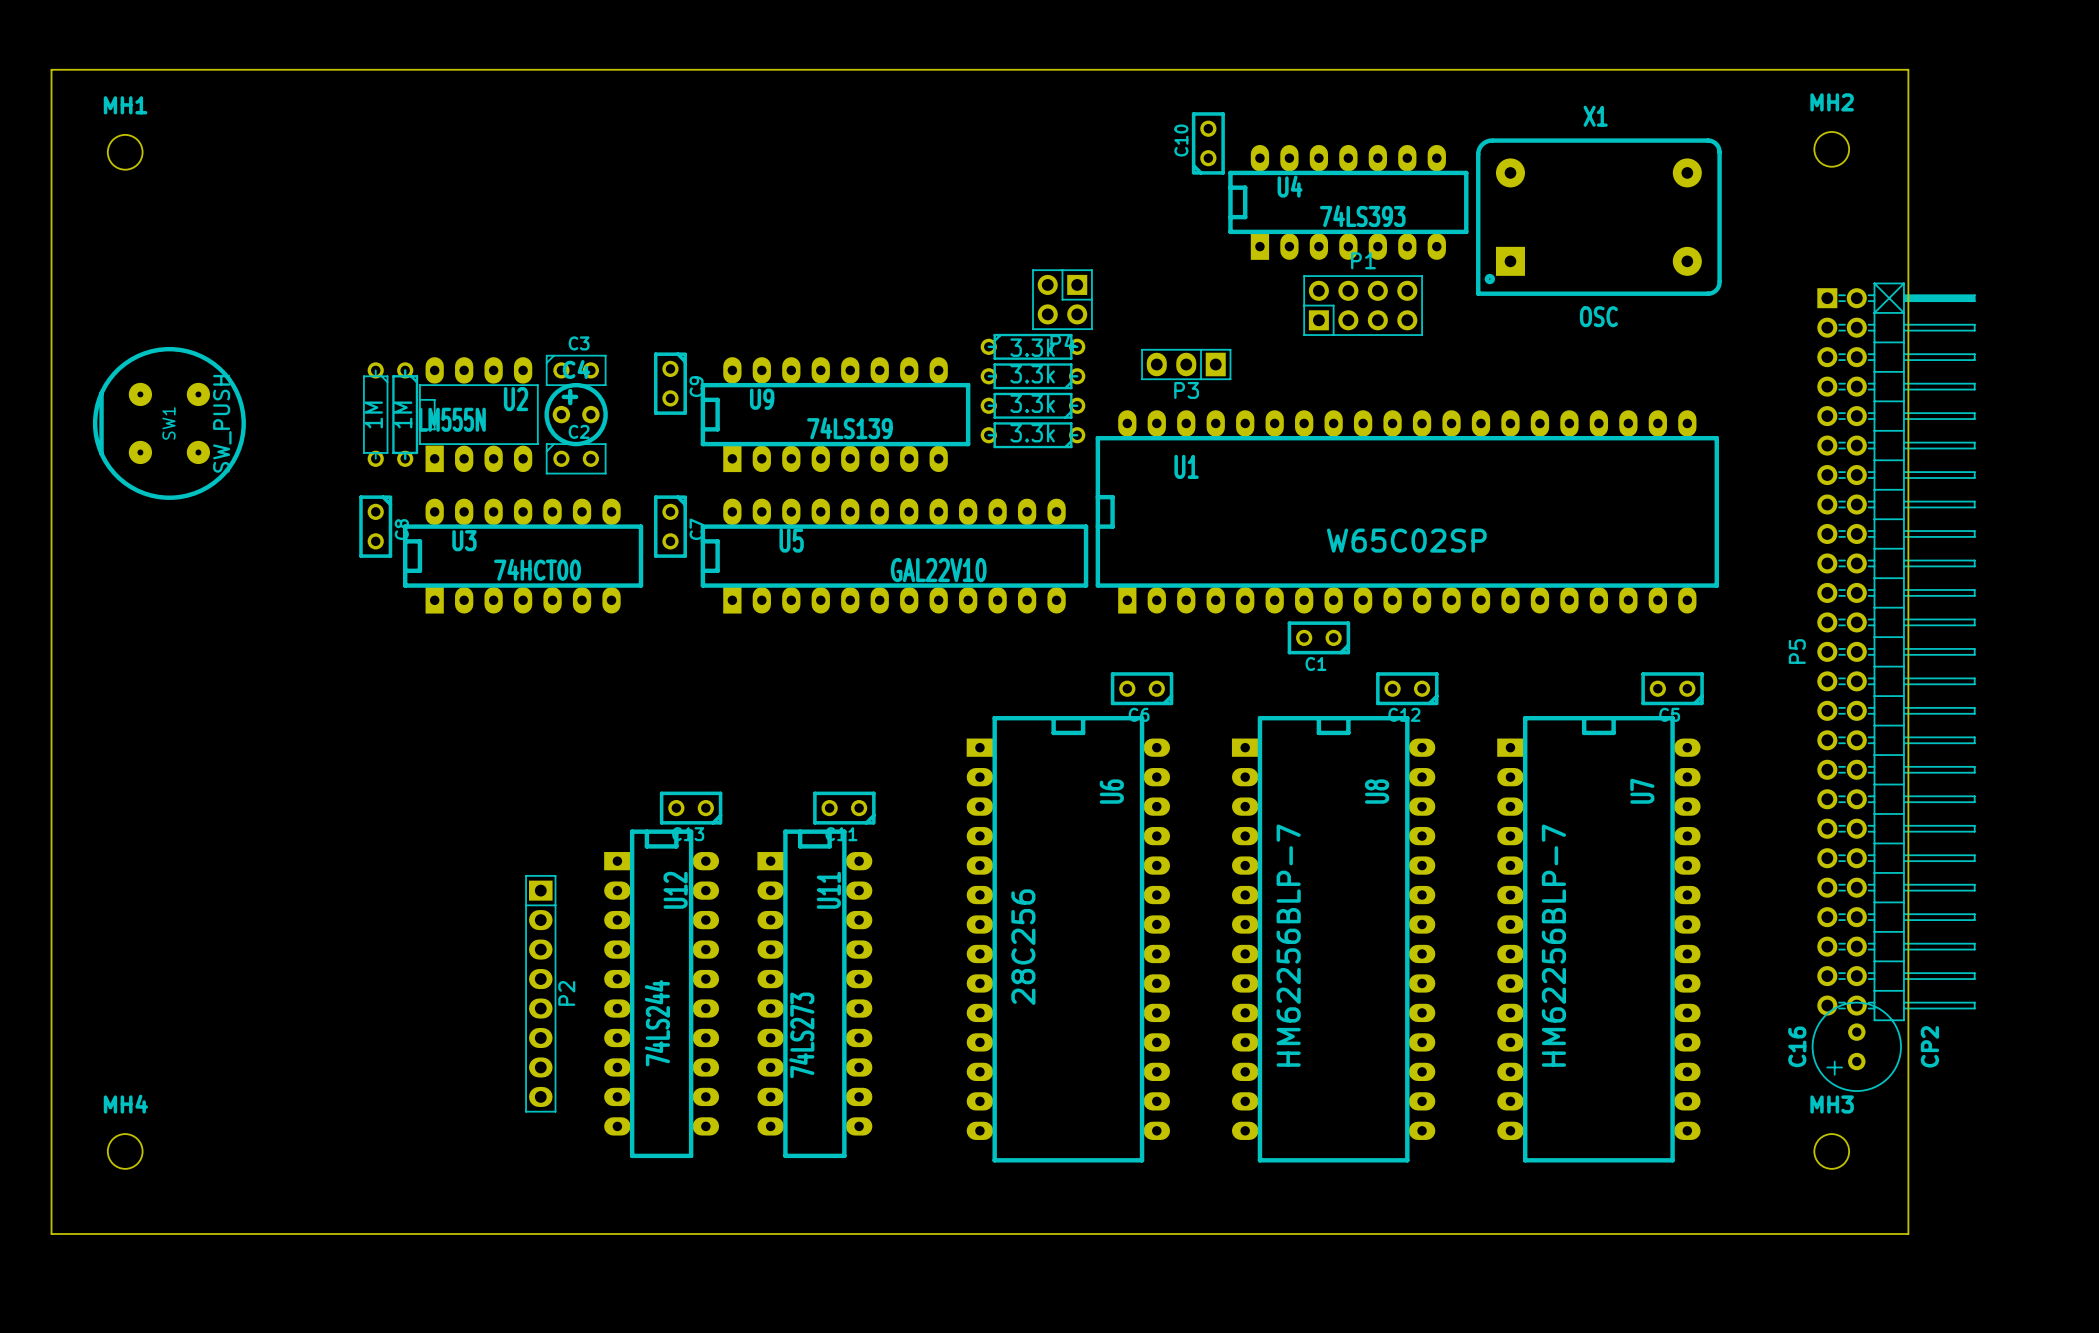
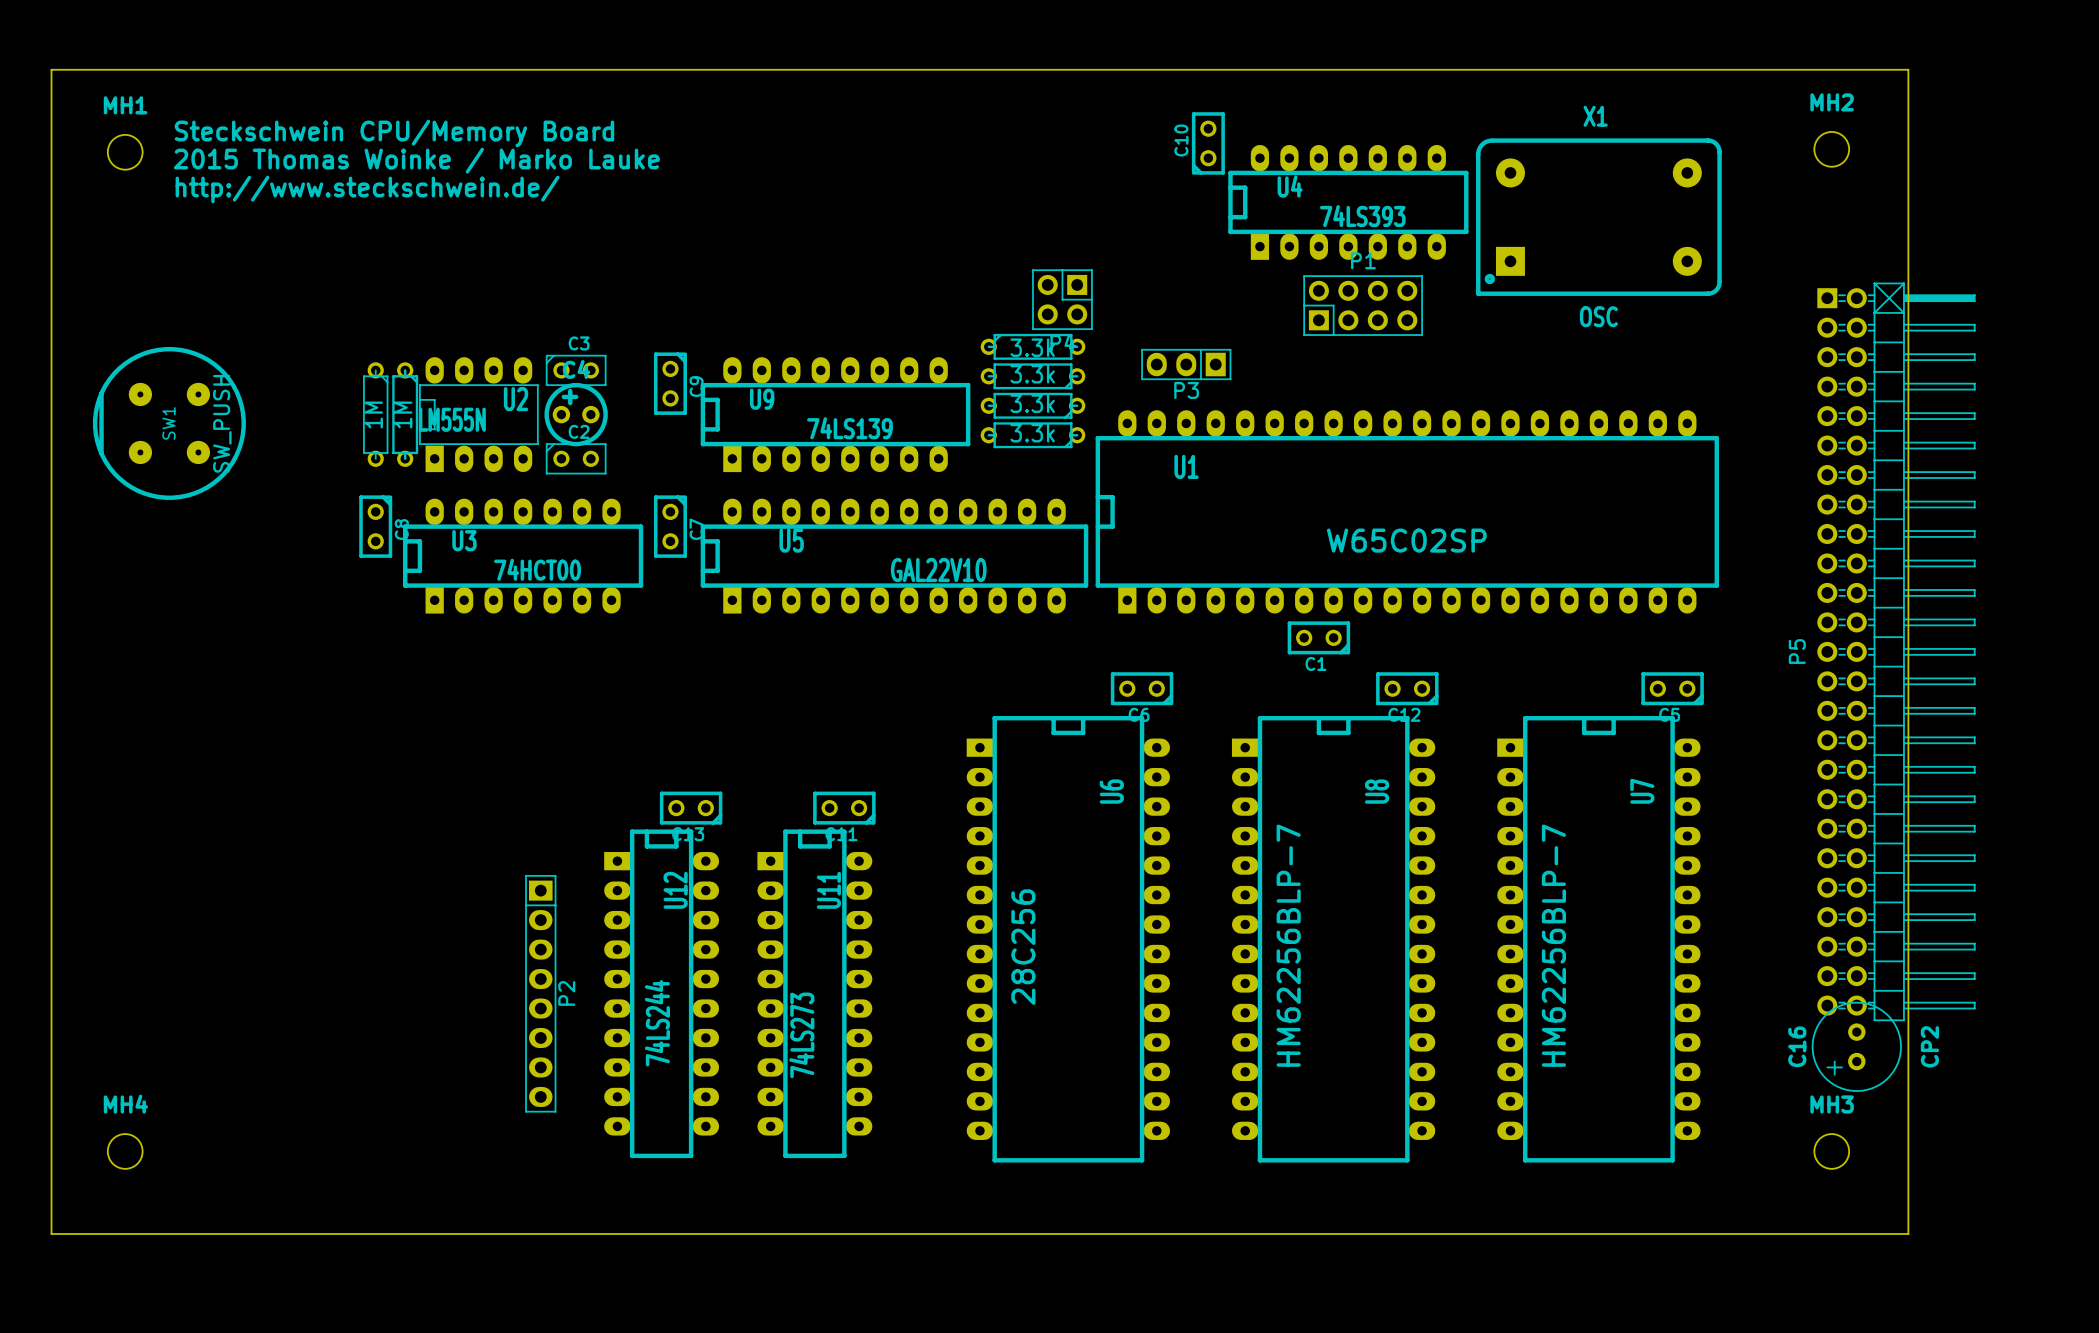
text: none -> Steckschwein CPU/Memory Board (394, 133)
text: none -> 2015 Thomas Woinke / Marko Lauke (416, 160)
text: none -> http://www.steckschwein.de/ (367, 189)

